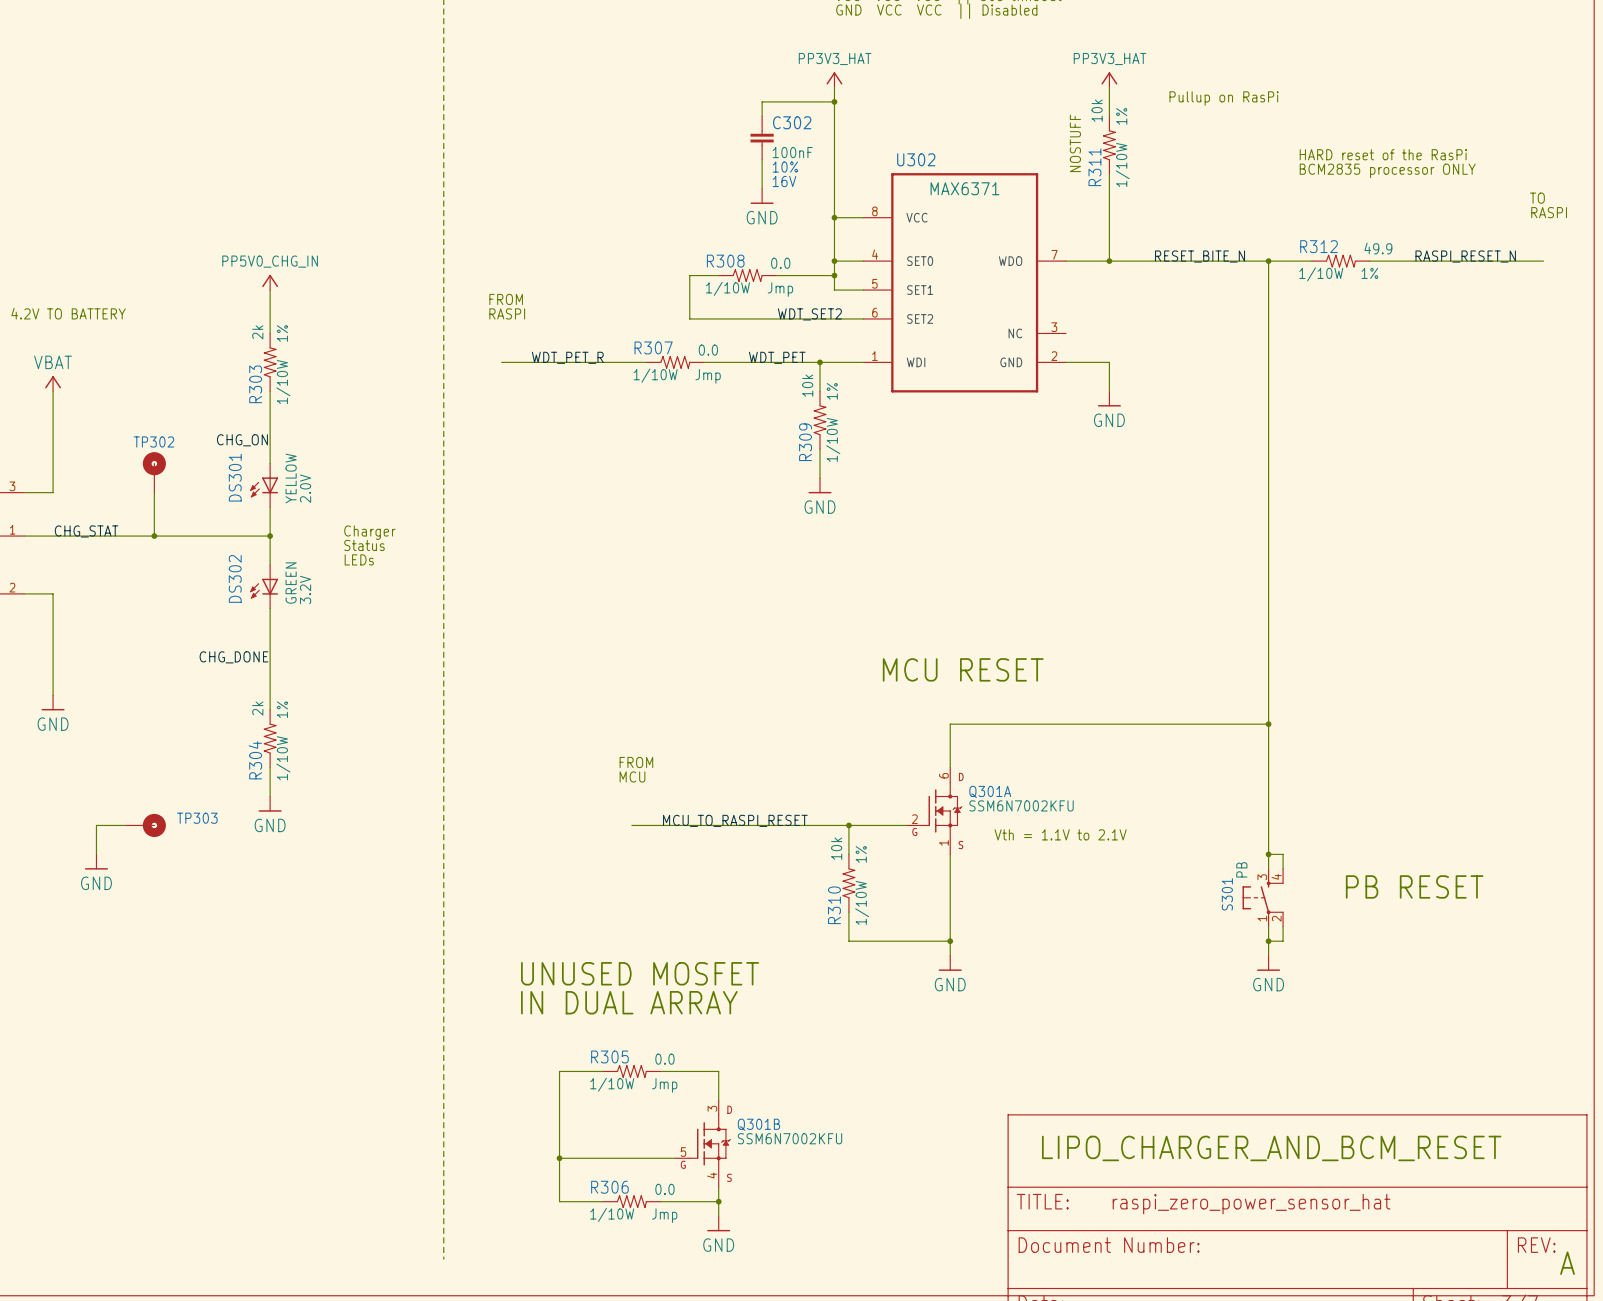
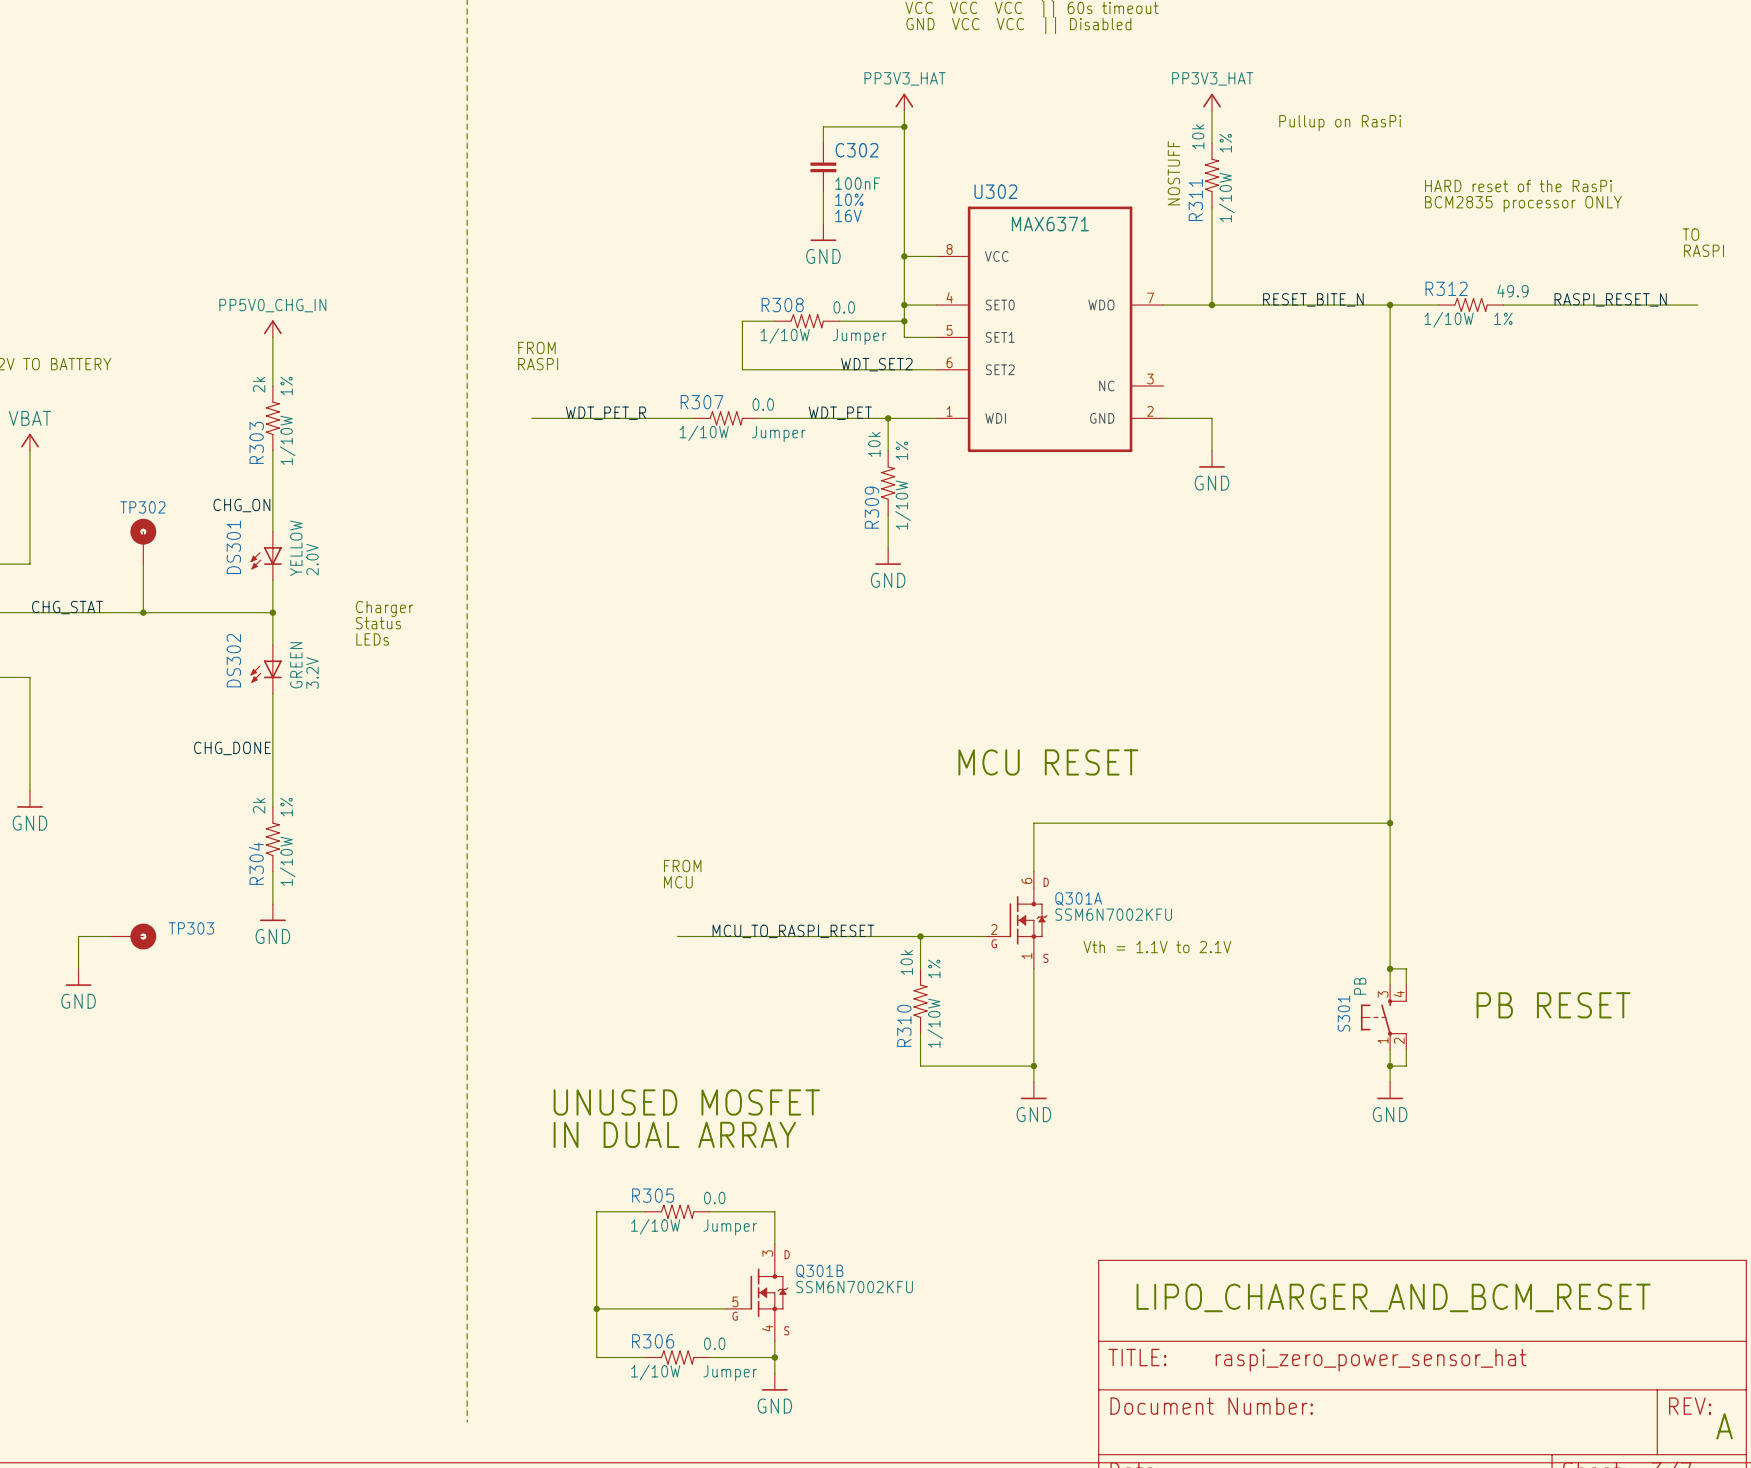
R308 text: Jmp (780, 289) -> Jumper (859, 336)
R307 text: Jmp (708, 376) -> Jumper (778, 434)
R305 text: Jmp (664, 1085) -> Jumper (730, 1227)
R306 text: Jmp (664, 1215) -> Jumper (730, 1373)

